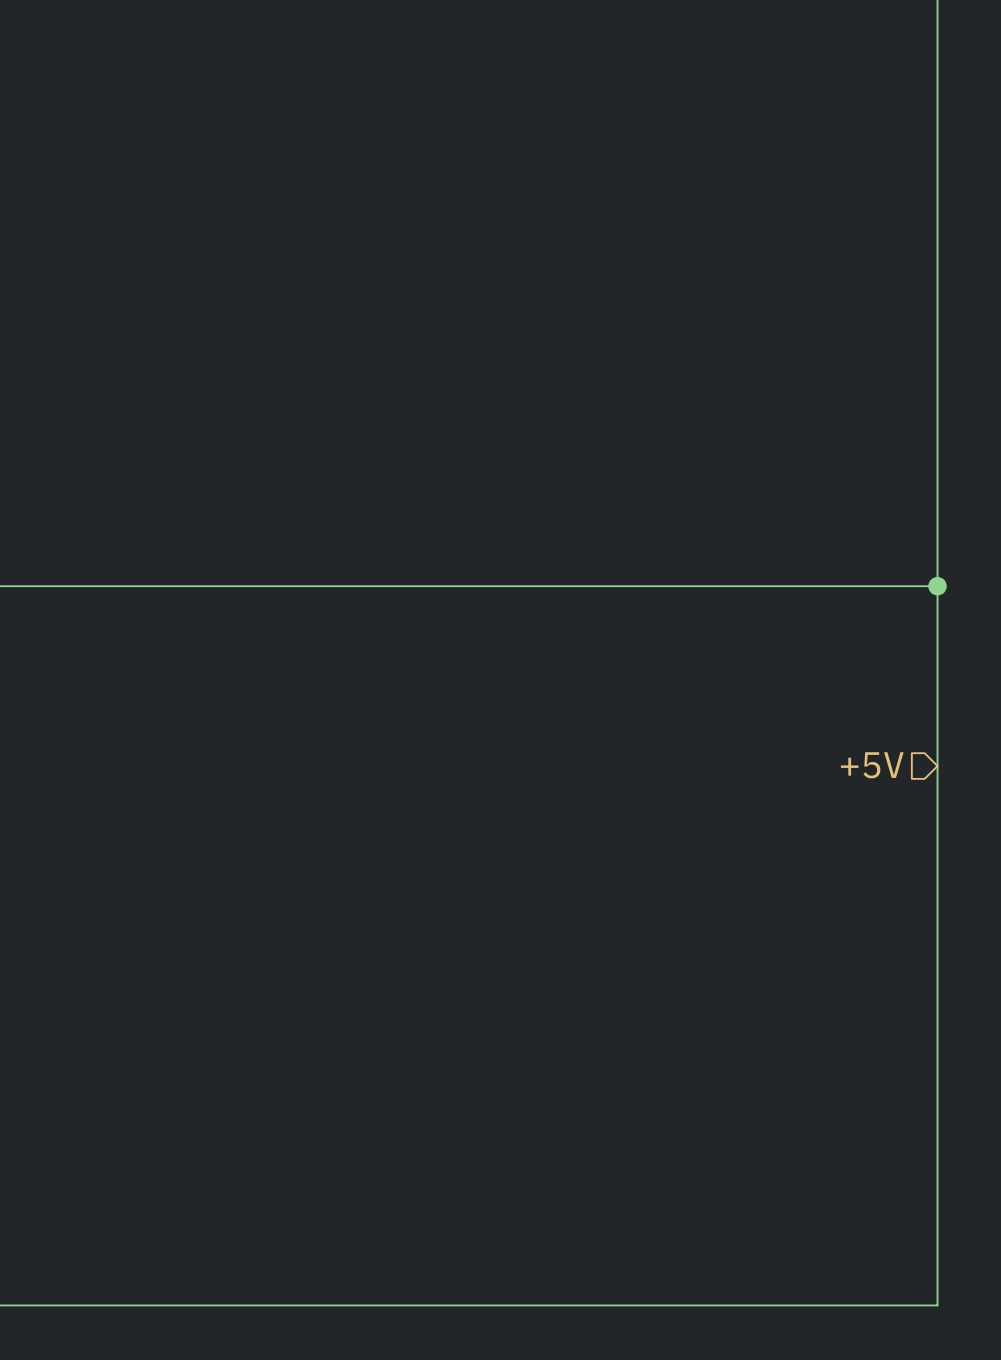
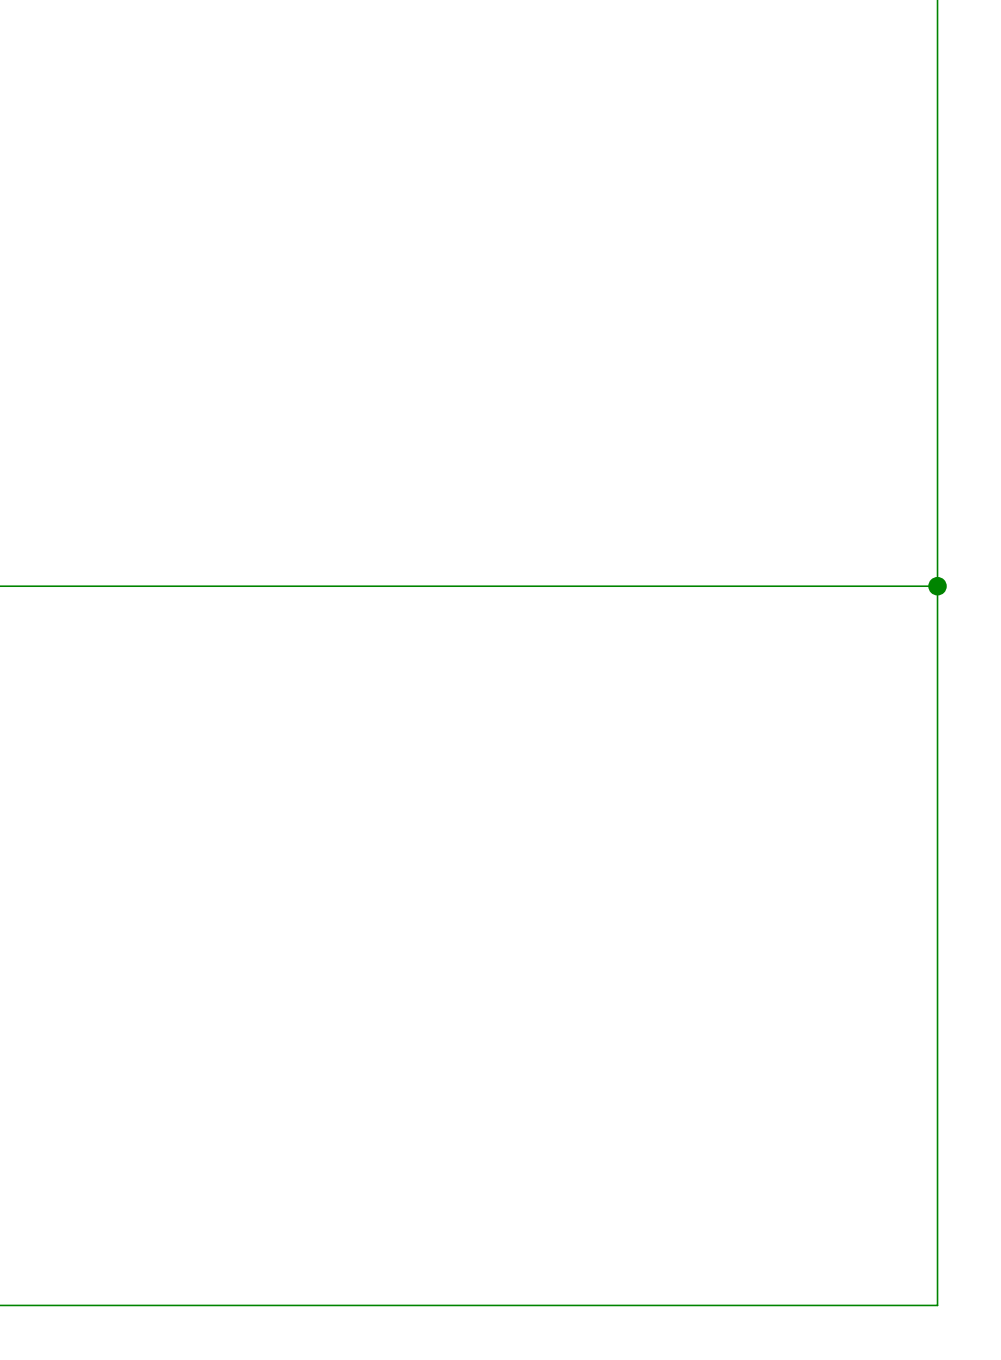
hierarchical label: +5V (872, 765) -> none

